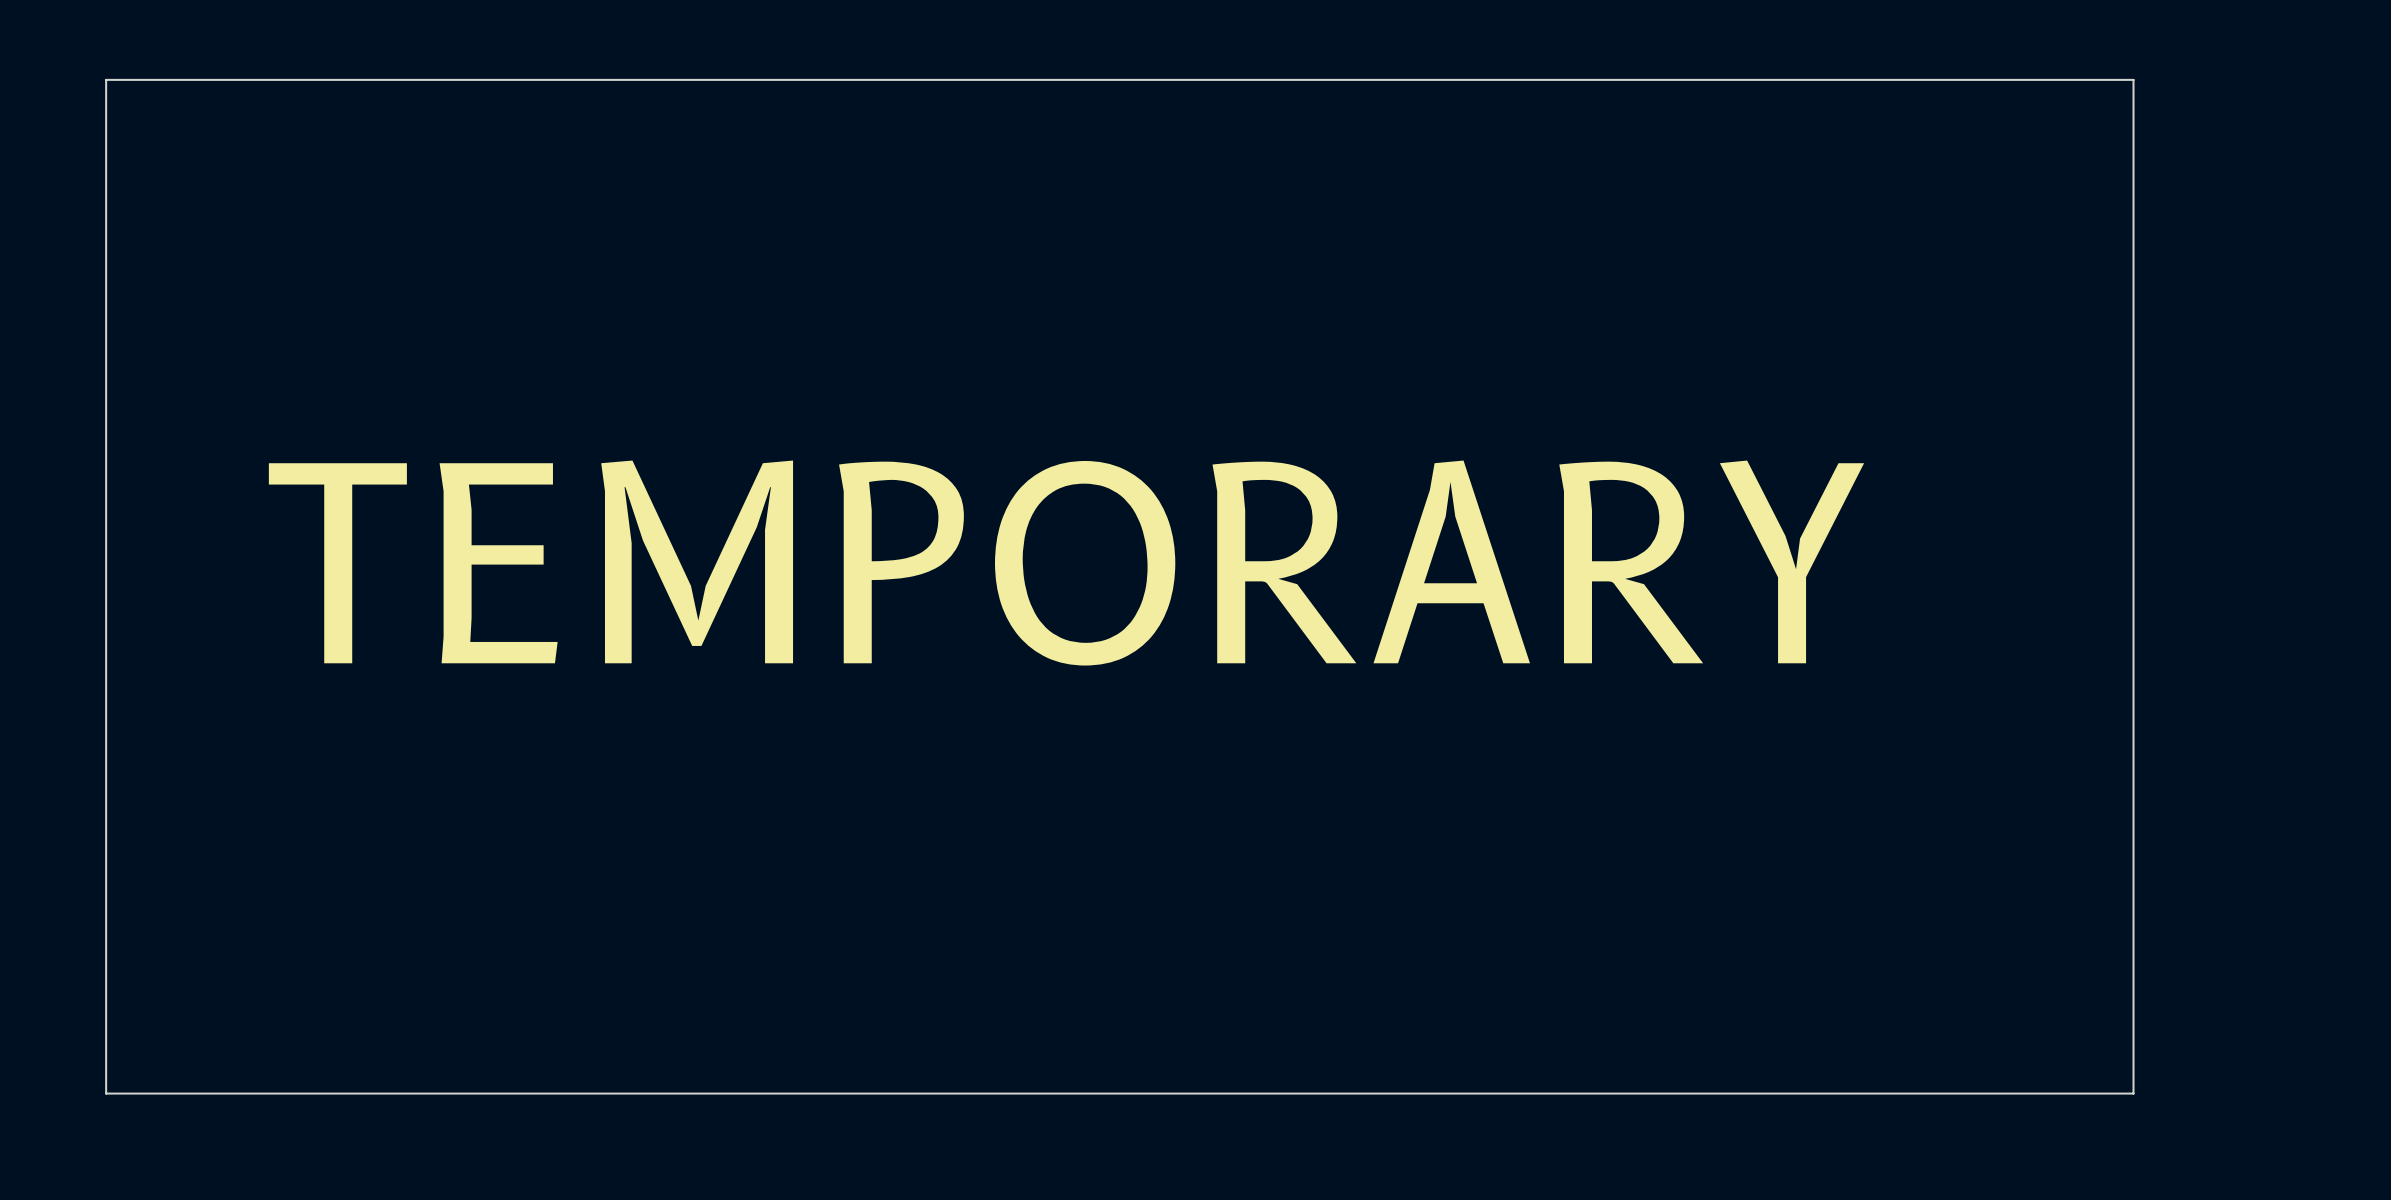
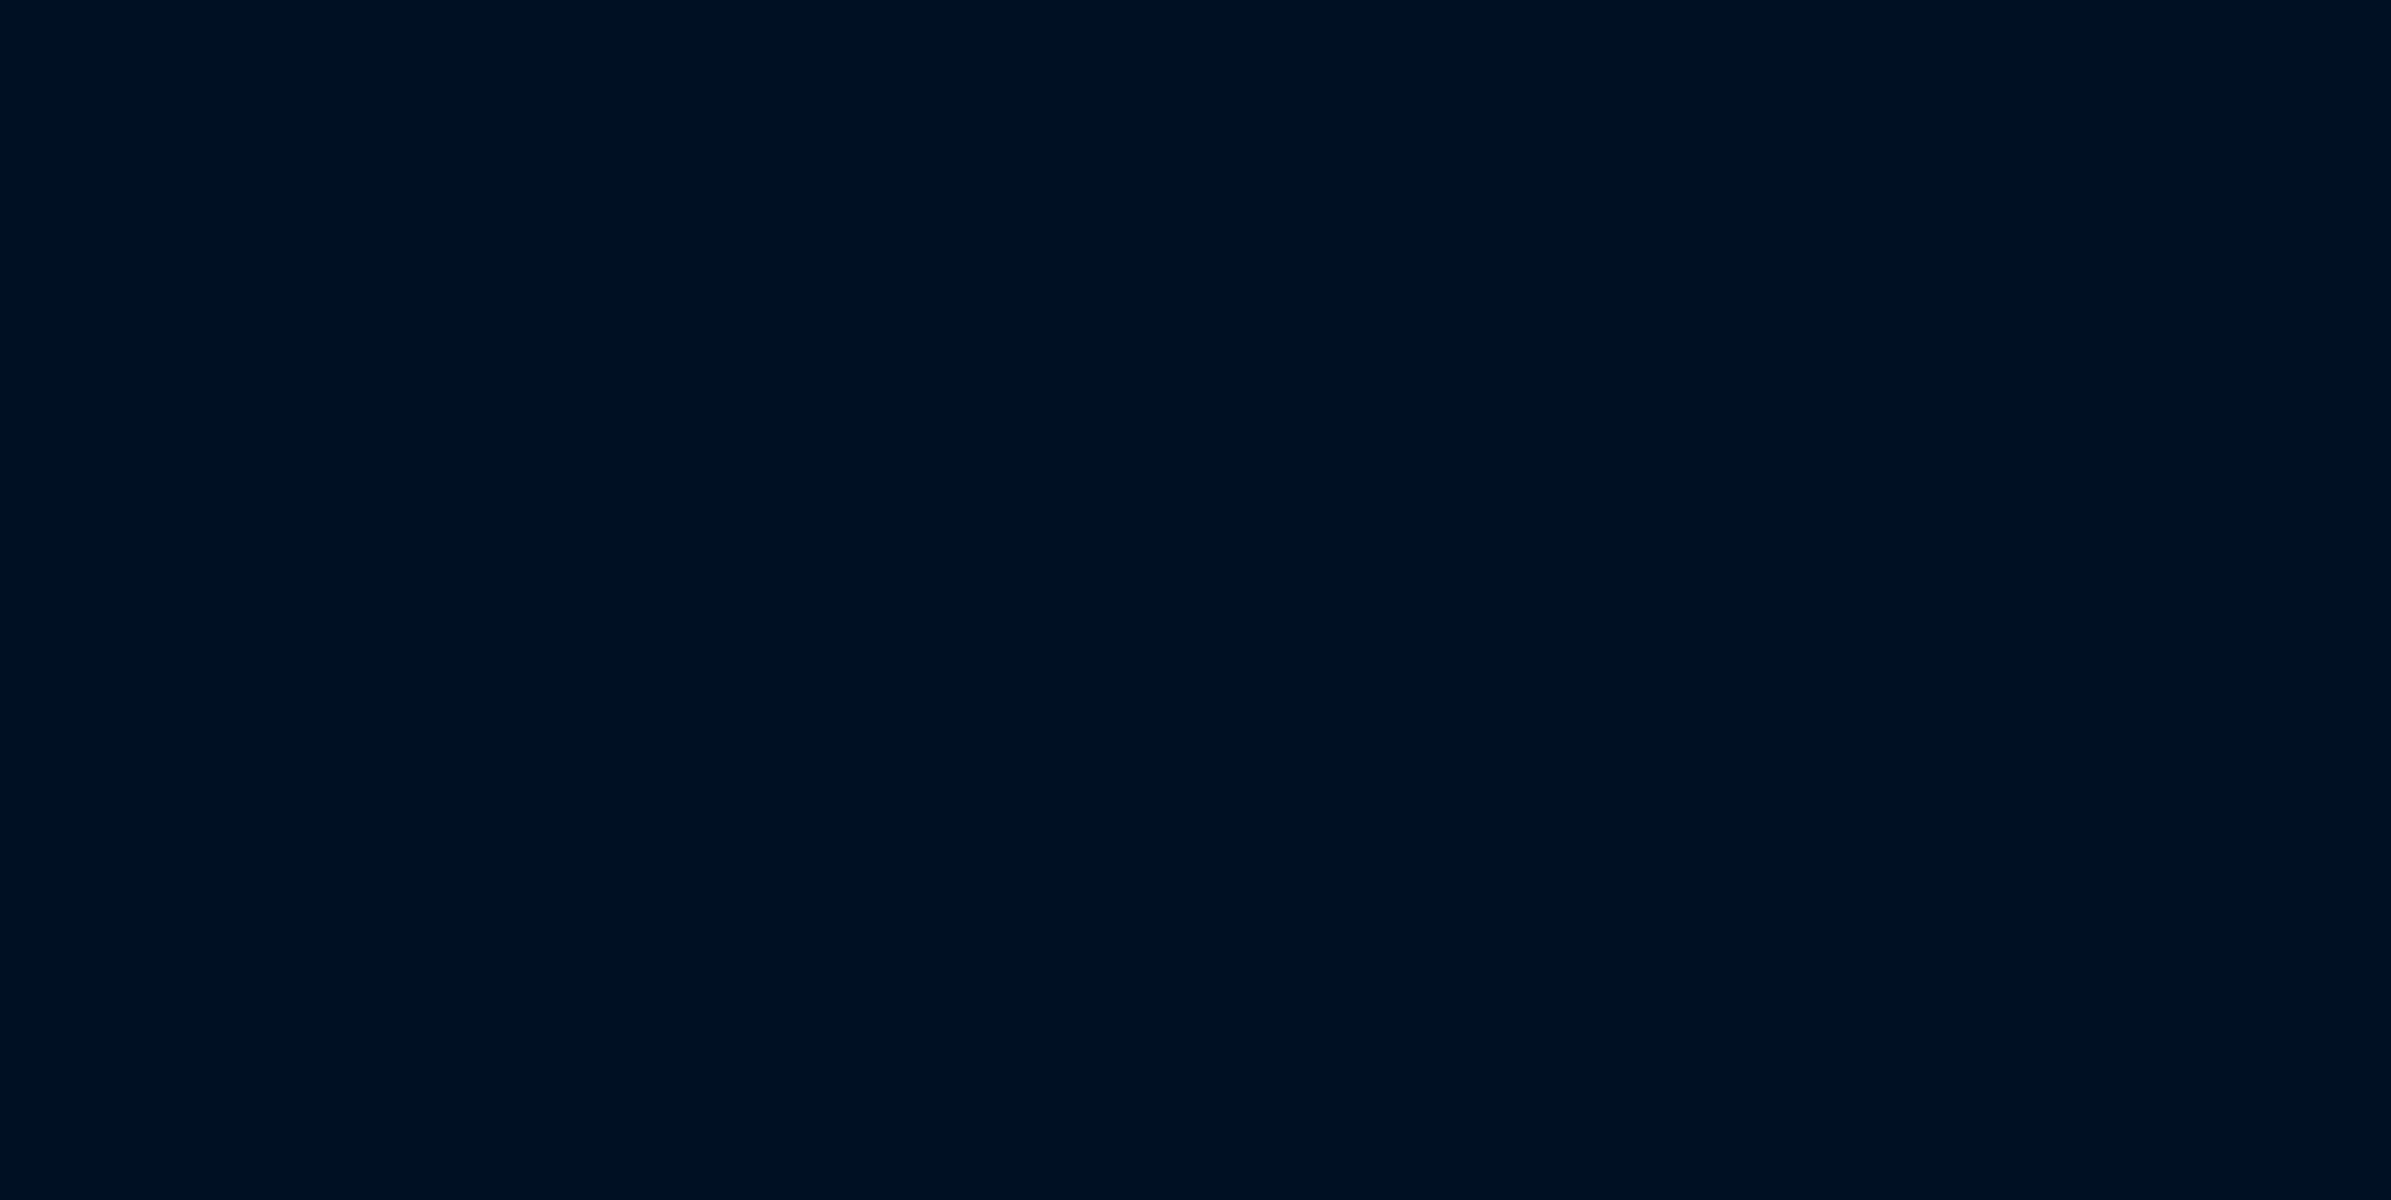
board edge: (106, 79) (2133, 79) (2133, 1093) (106, 1093) (106, 79) -> none
text: TEMPORARY (1066, 563) -> none

